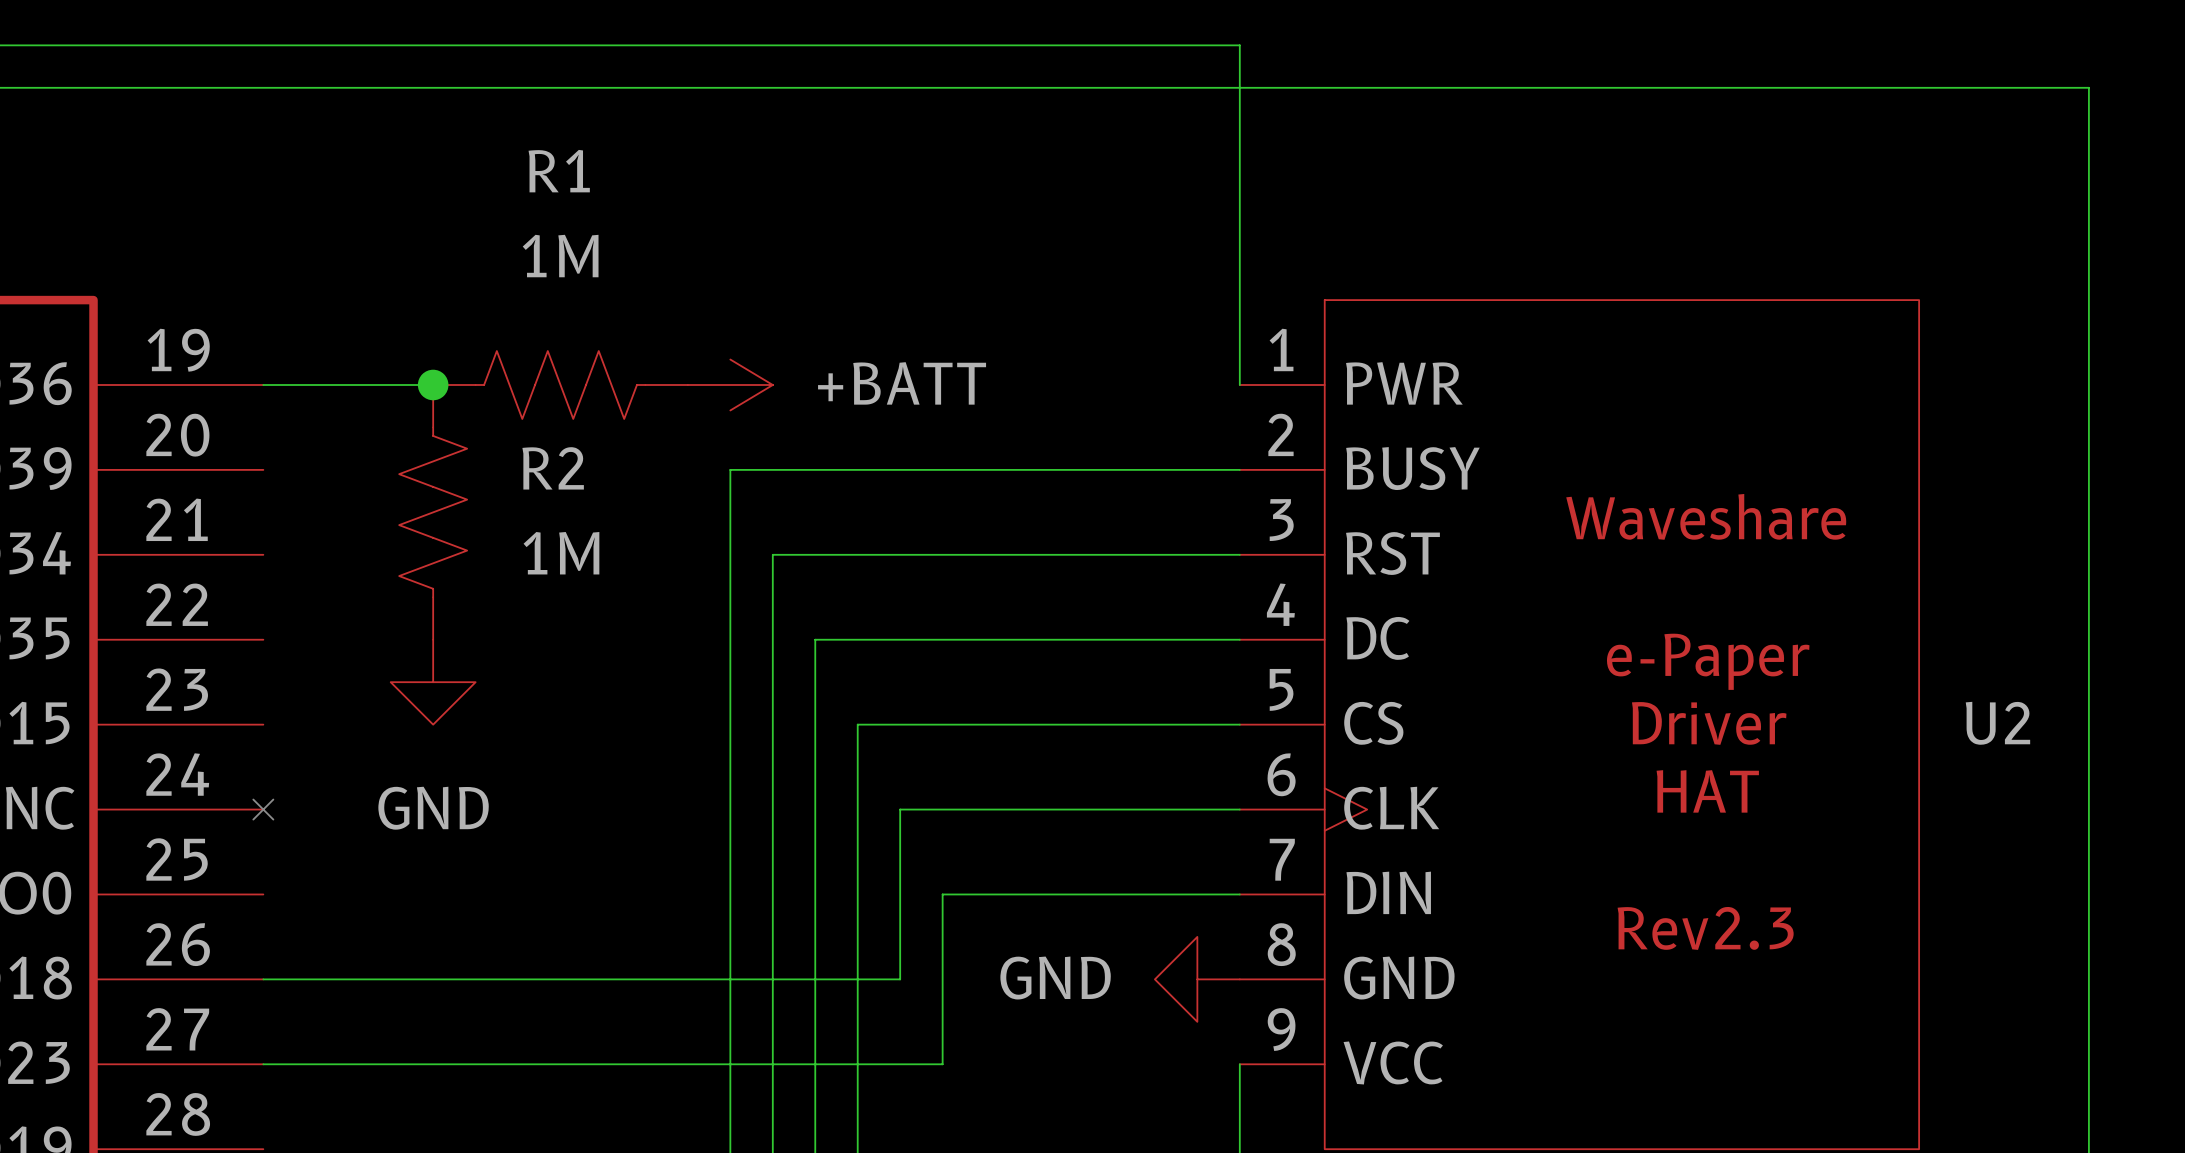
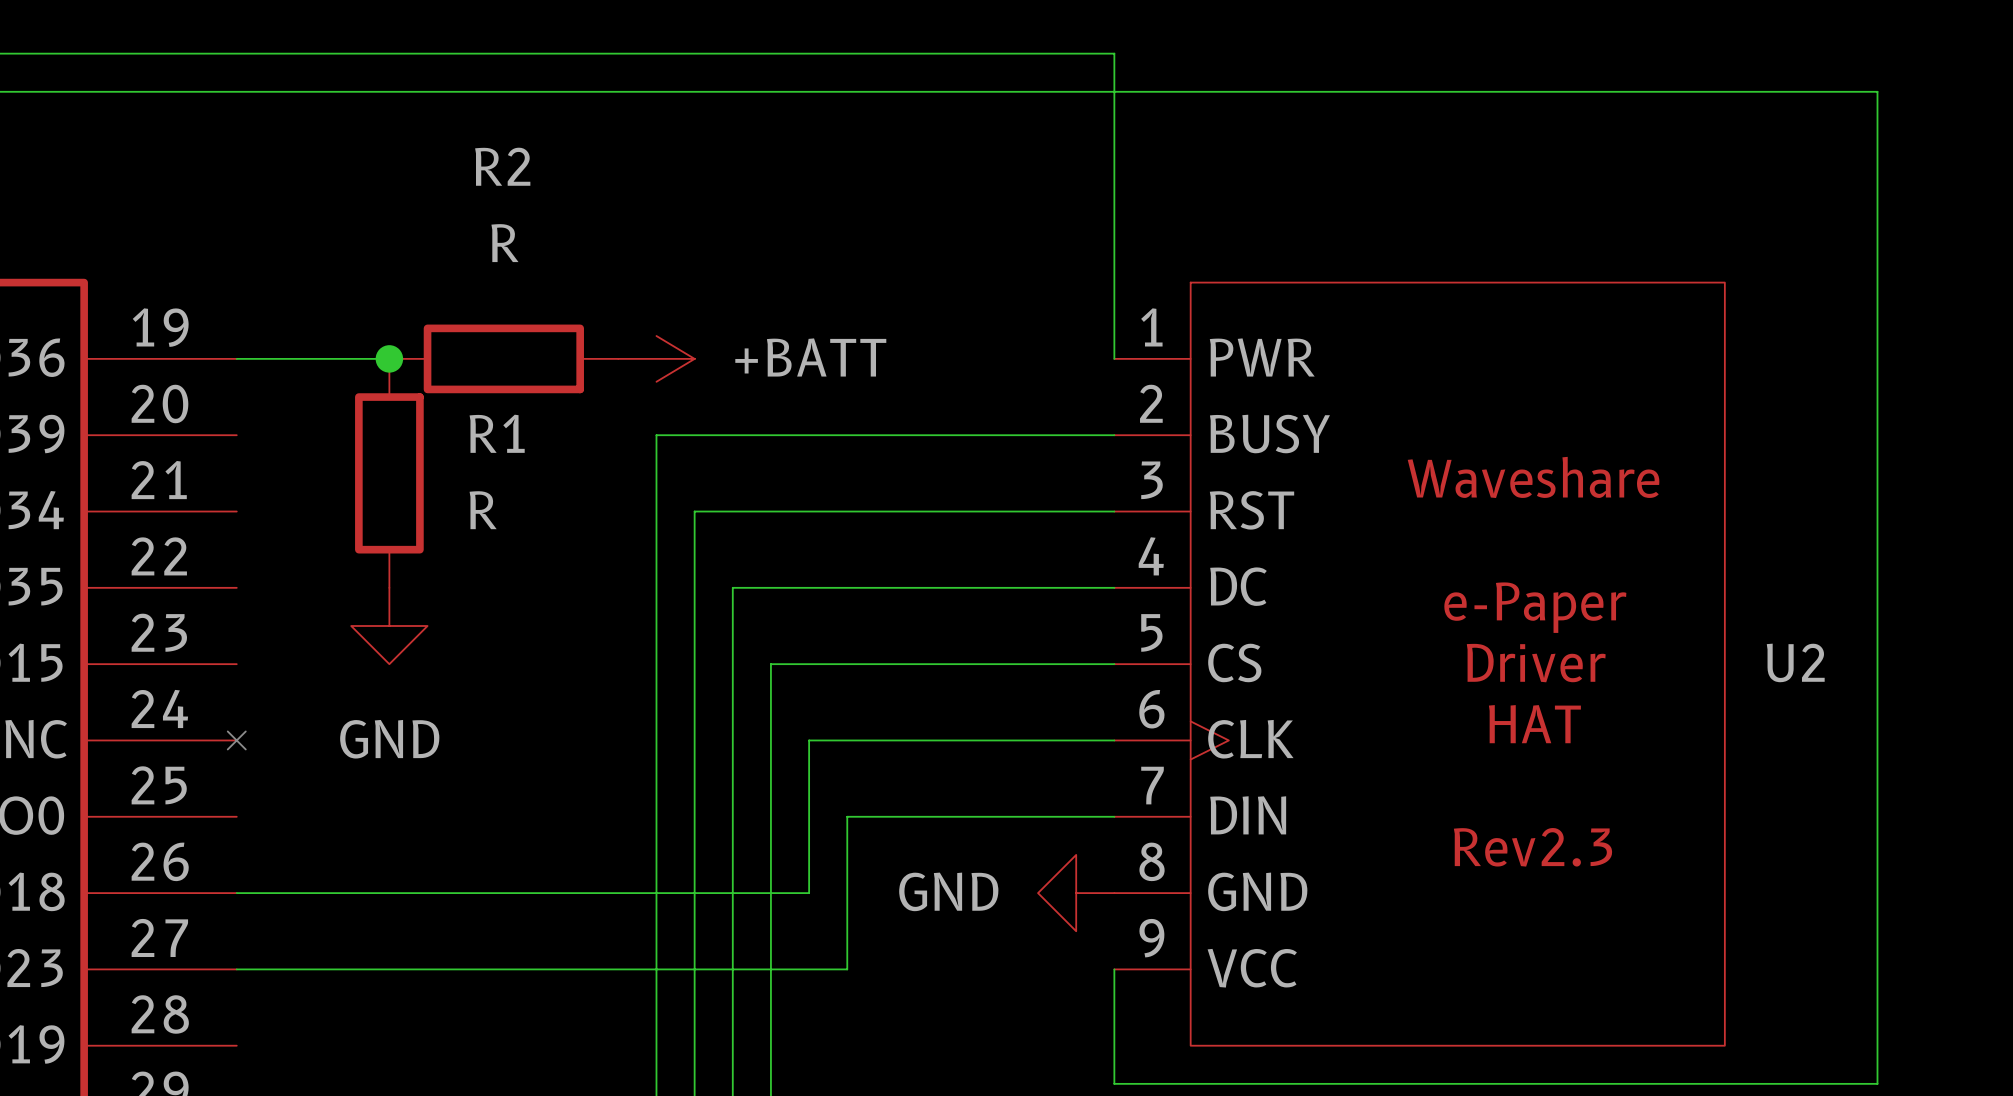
R1 name position: R1 (559, 171) -> R1 (497, 433)
R1 value: 1M (560, 256) -> R (483, 510)
R1 symbol: [433, 351, 688, 419] -> [355, 358, 424, 588]
R2 symbol: [399, 385, 468, 640] -> [389, 324, 619, 394]
R2 name position: R2 (553, 468) -> R2 (502, 166)
R2 value: 1M (561, 553) -> R (504, 243)

